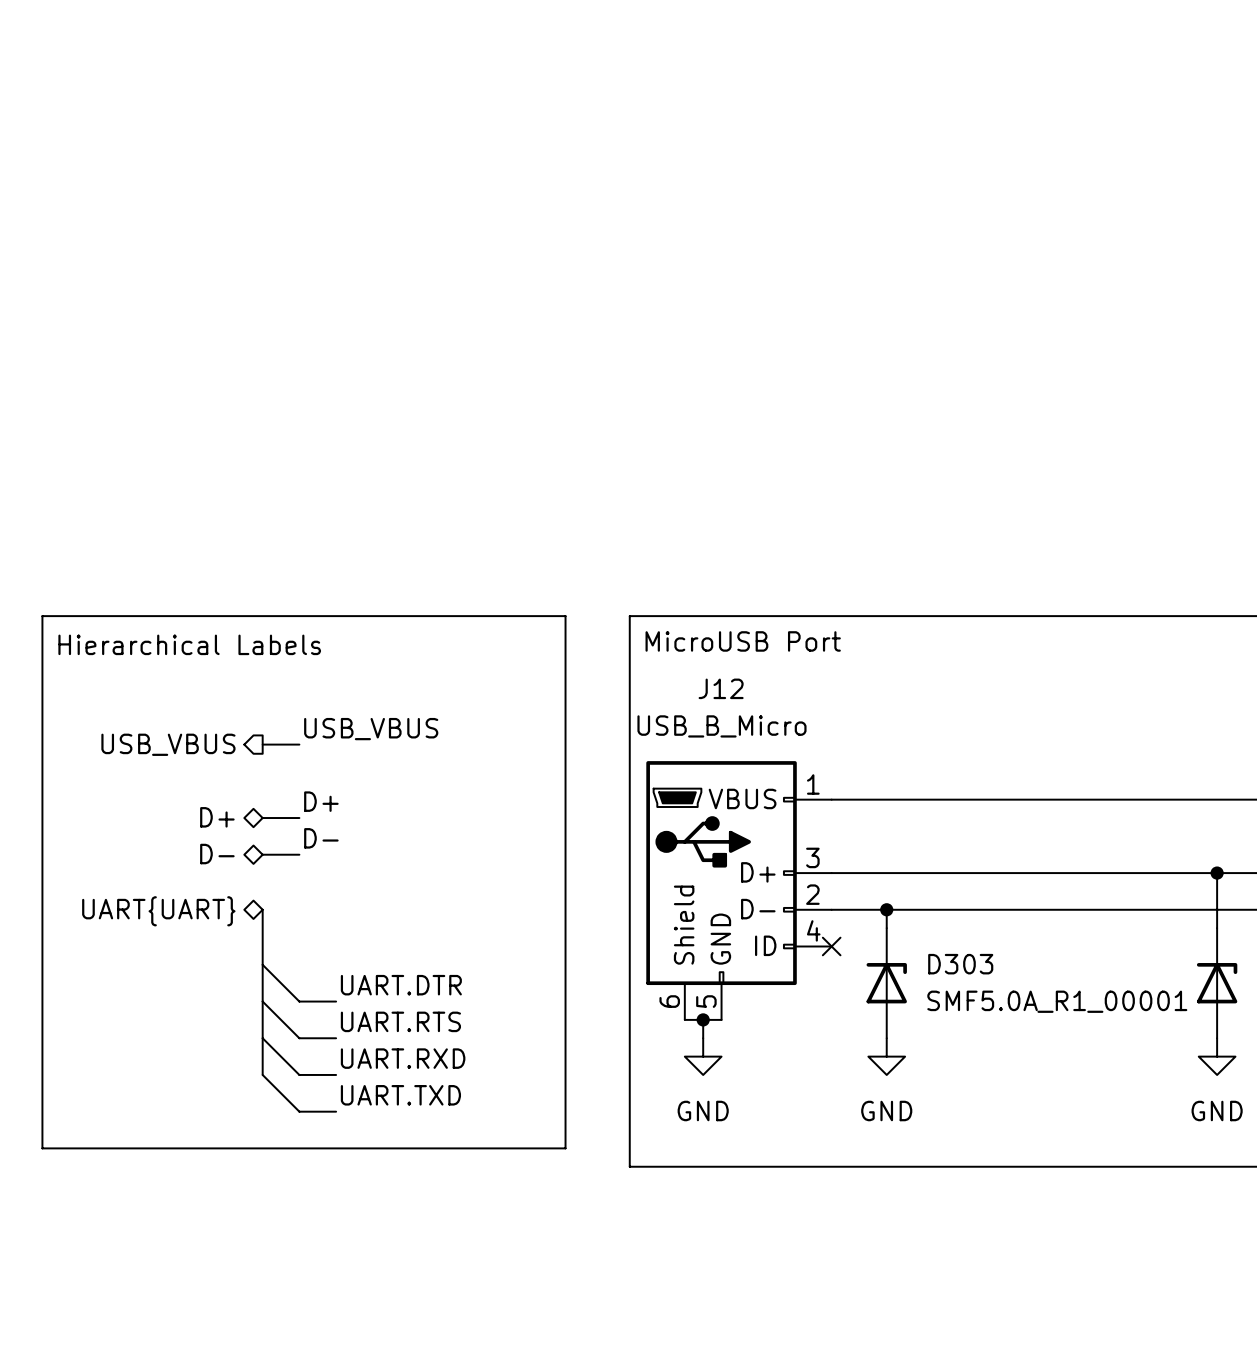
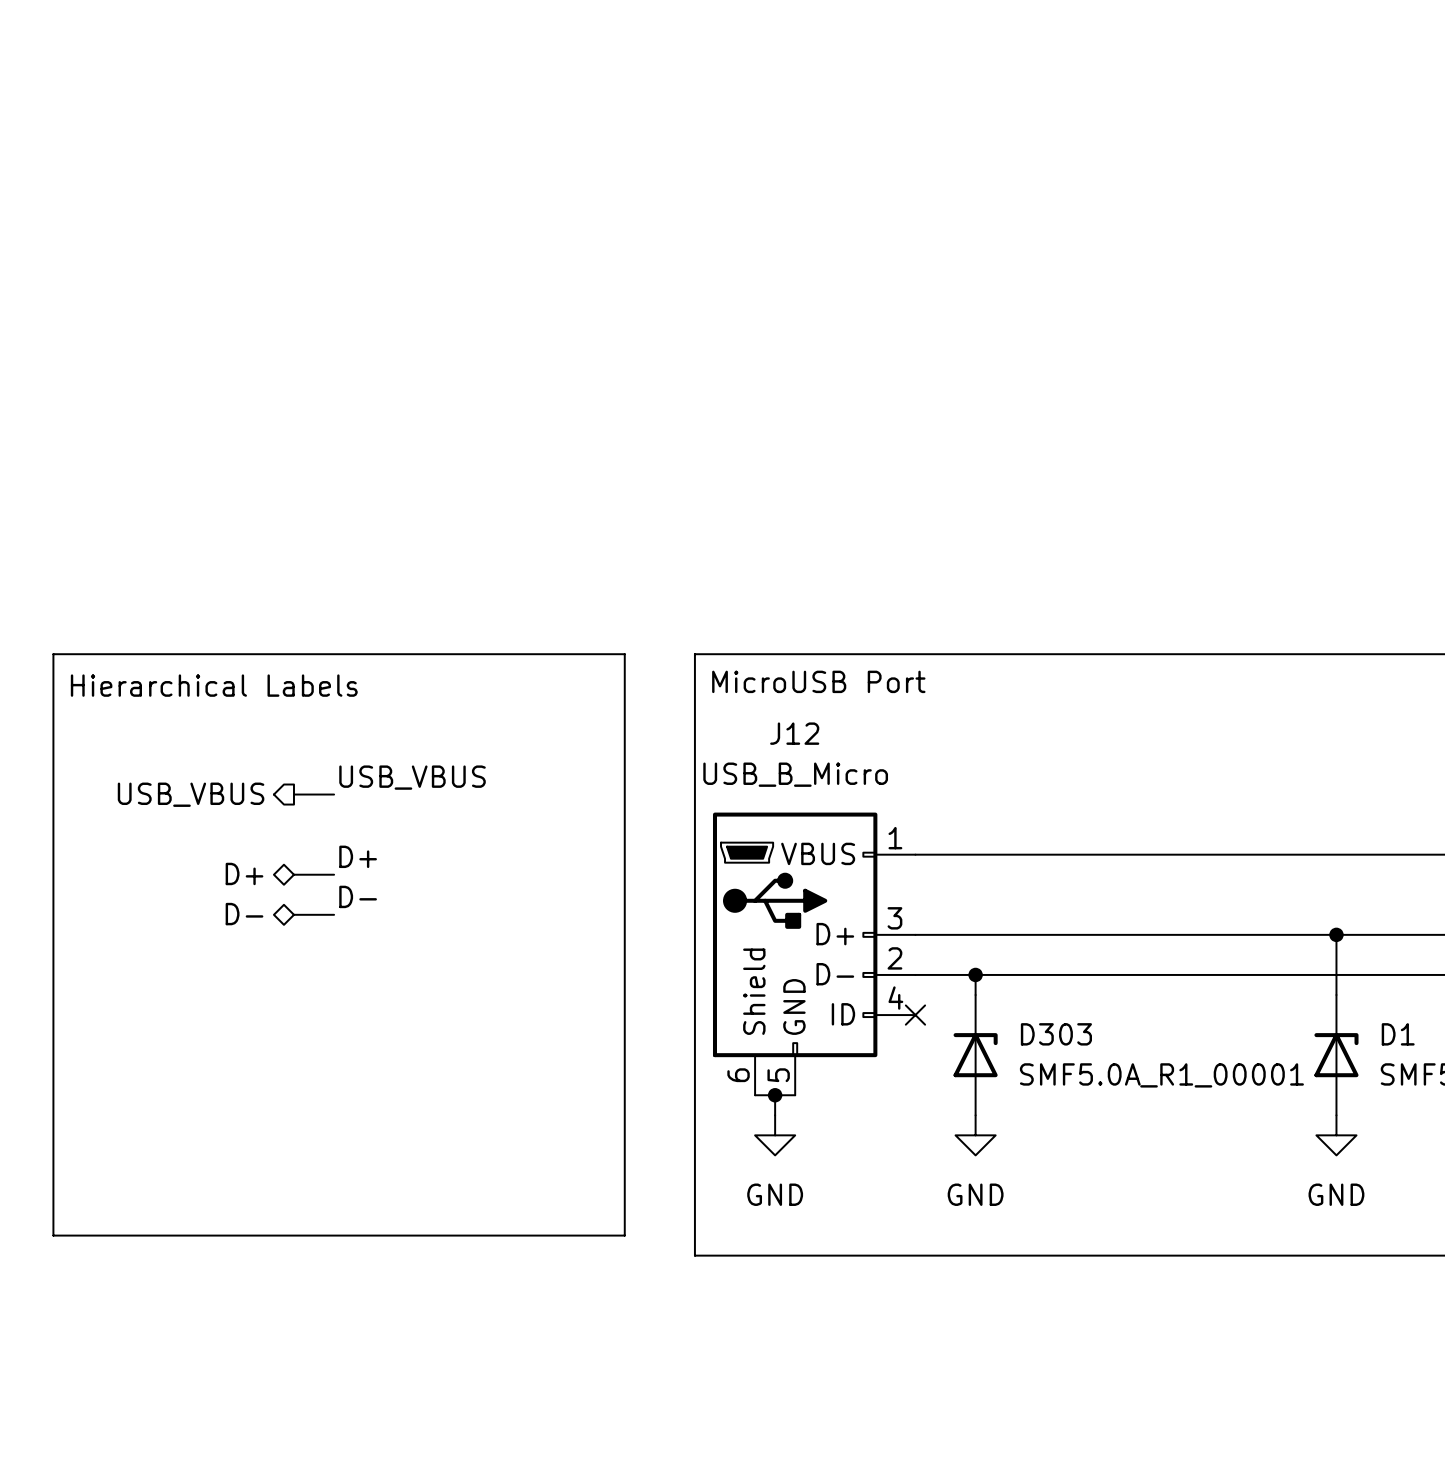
bus: (262, 909) (262, 1074) -> none
hierarchical label: UART{UART} (158, 911) -> none
wire: (262, 964) (299, 1001) (336, 1001) -> none
label: UART.DTR (401, 985) -> none
wire: (262, 1001) (299, 1038) (336, 1038) -> none
label: UART.RTS (400, 1021) -> none
wire: (262, 1038) (299, 1074) (336, 1074) -> none
label: UART.RXD (403, 1058) -> none
wire: (262, 1074) (299, 1111) (336, 1111) -> none
label: UART.TXD (400, 1095) -> none

